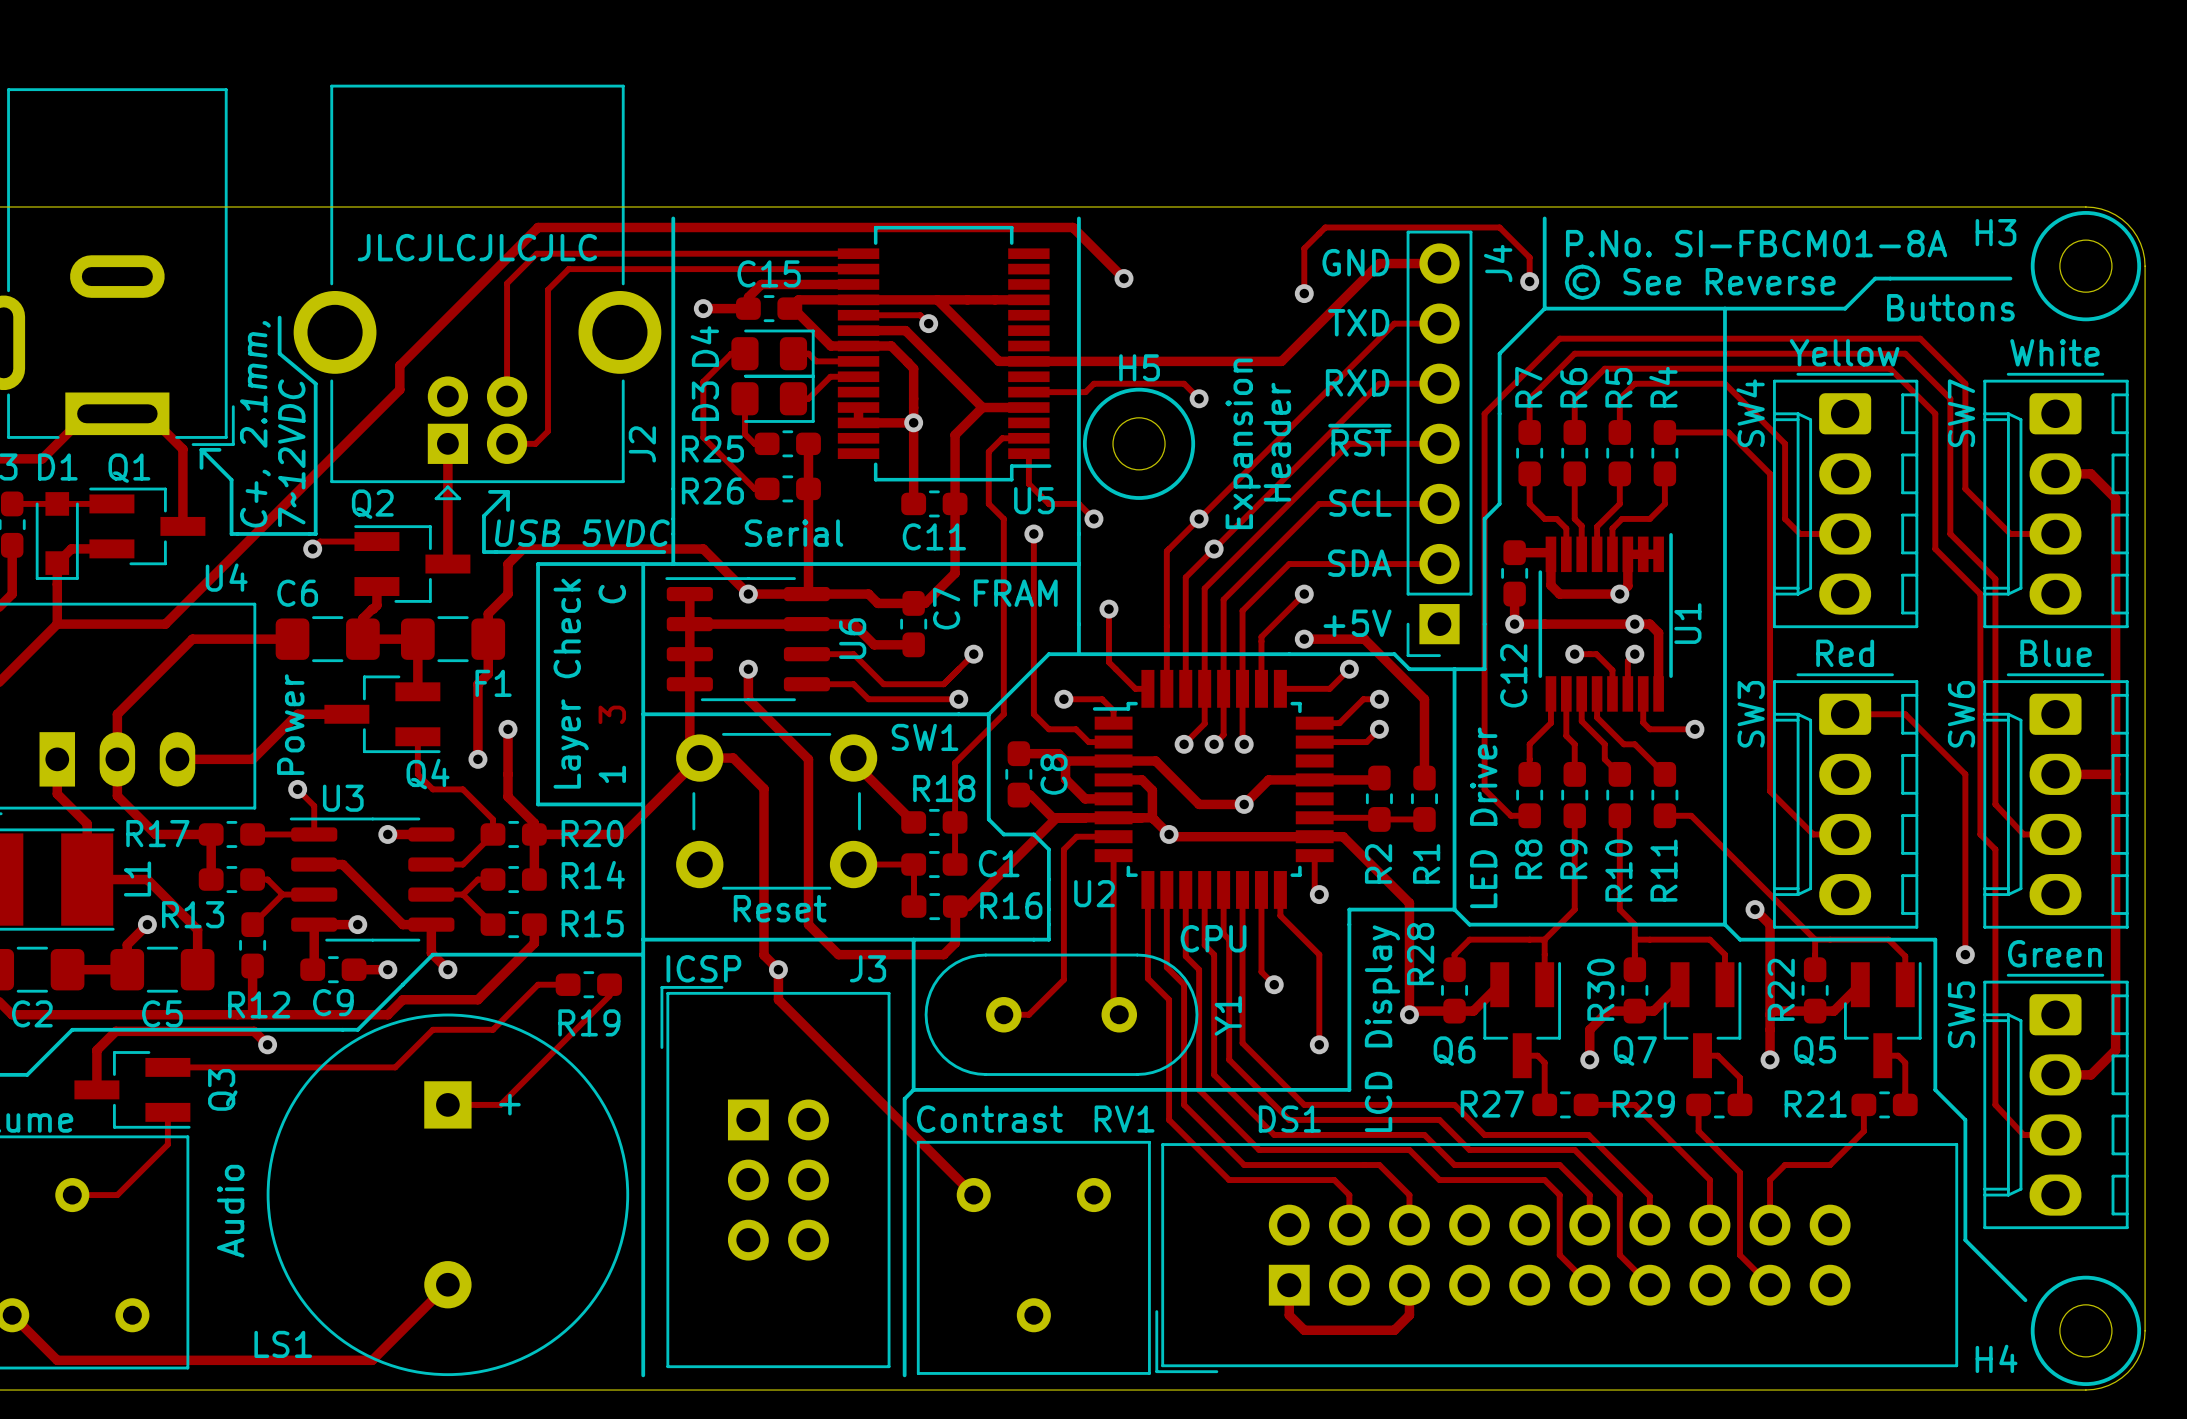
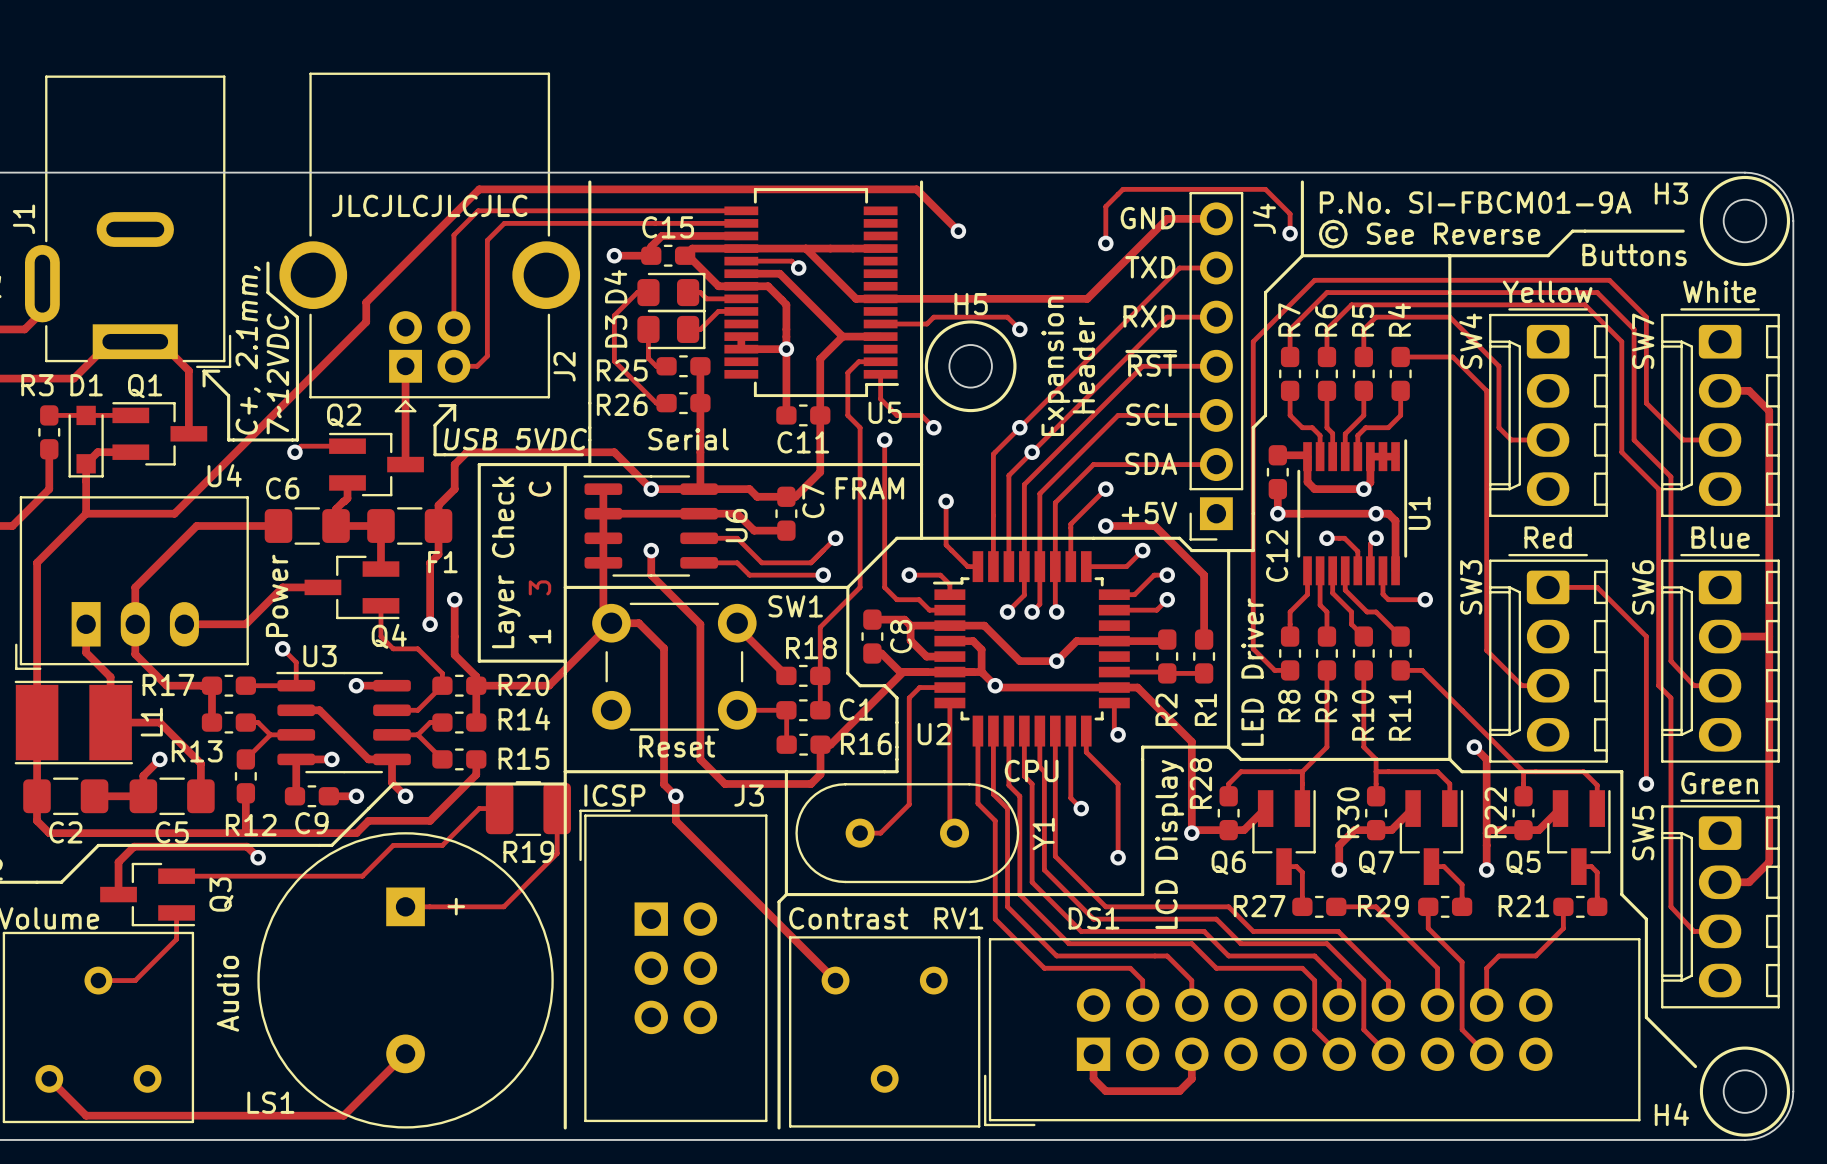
text: P.No. SI-FBCM01-8A (1756, 243) -> P.No. SI-FBCM01-9A (1475, 202)
R19 footprint: [555, 971, 622, 999] -> [485, 781, 571, 837]
track: (609, 984) (609, 995) (500, 1104) -> (557, 808) (557, 853) (503, 906) (448, 906)

